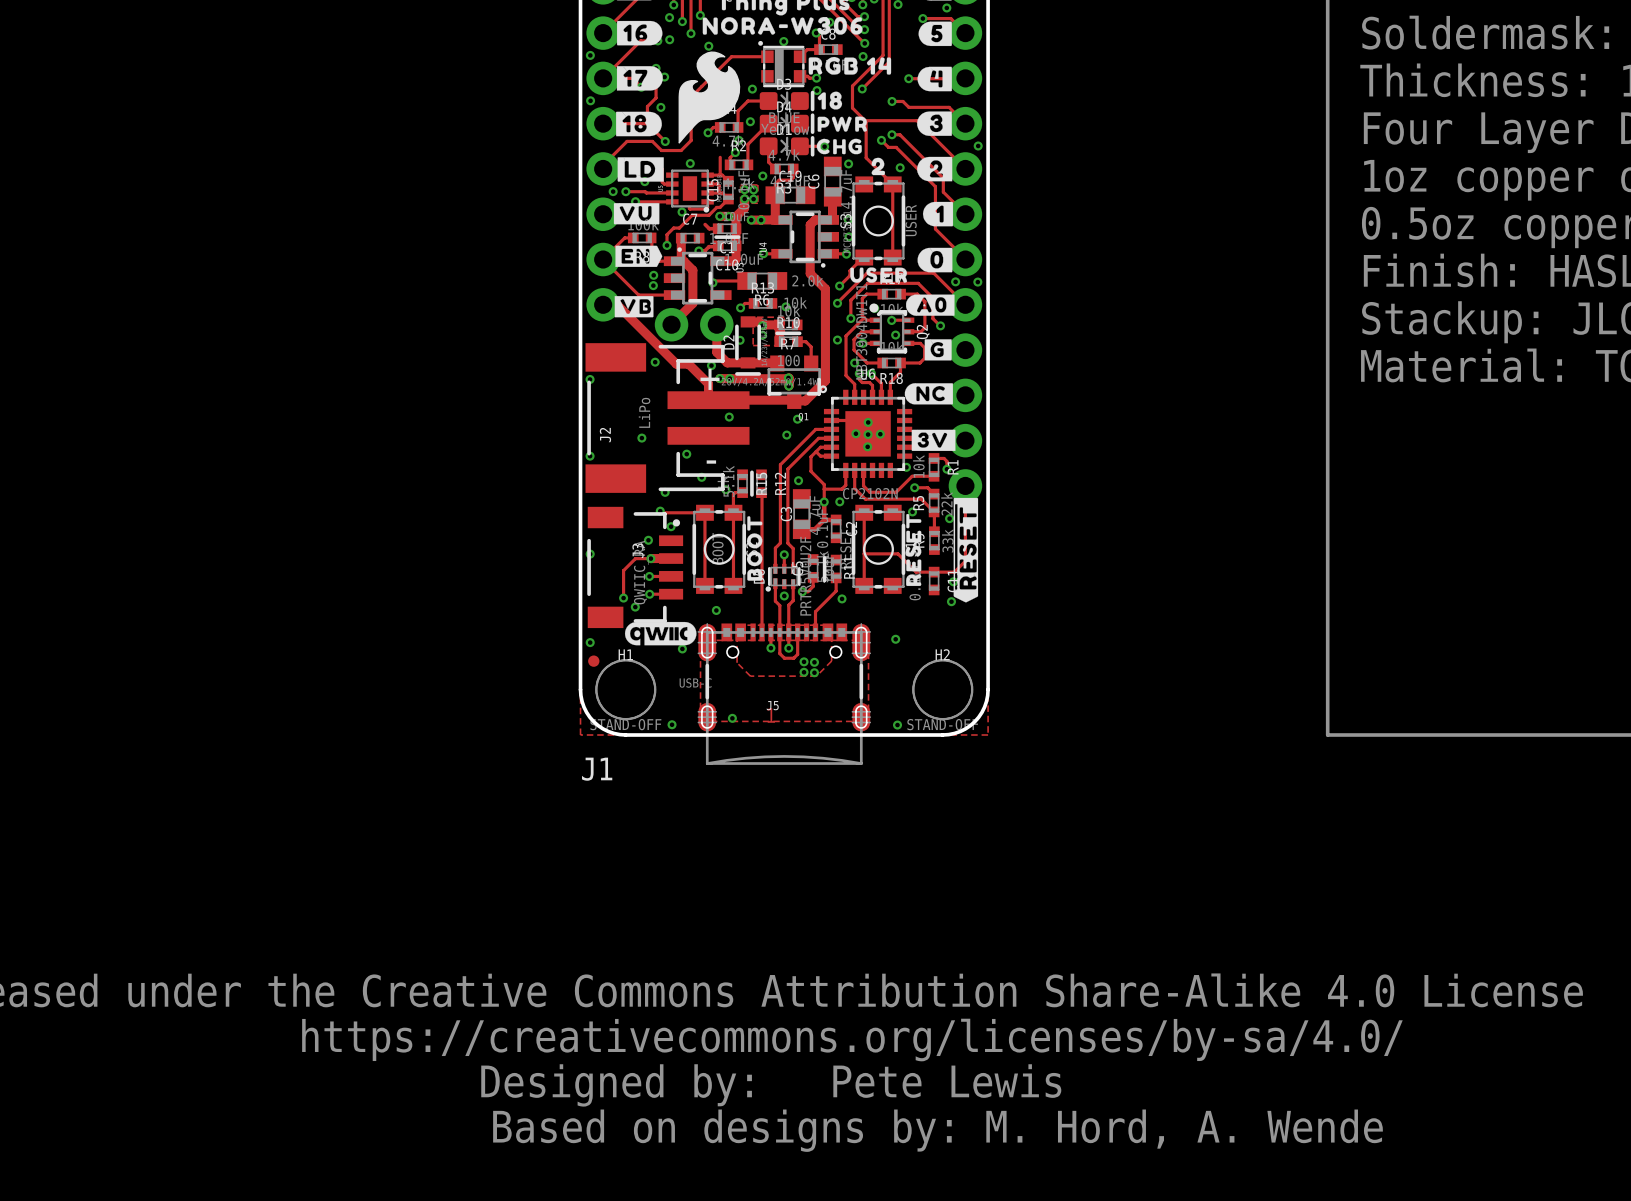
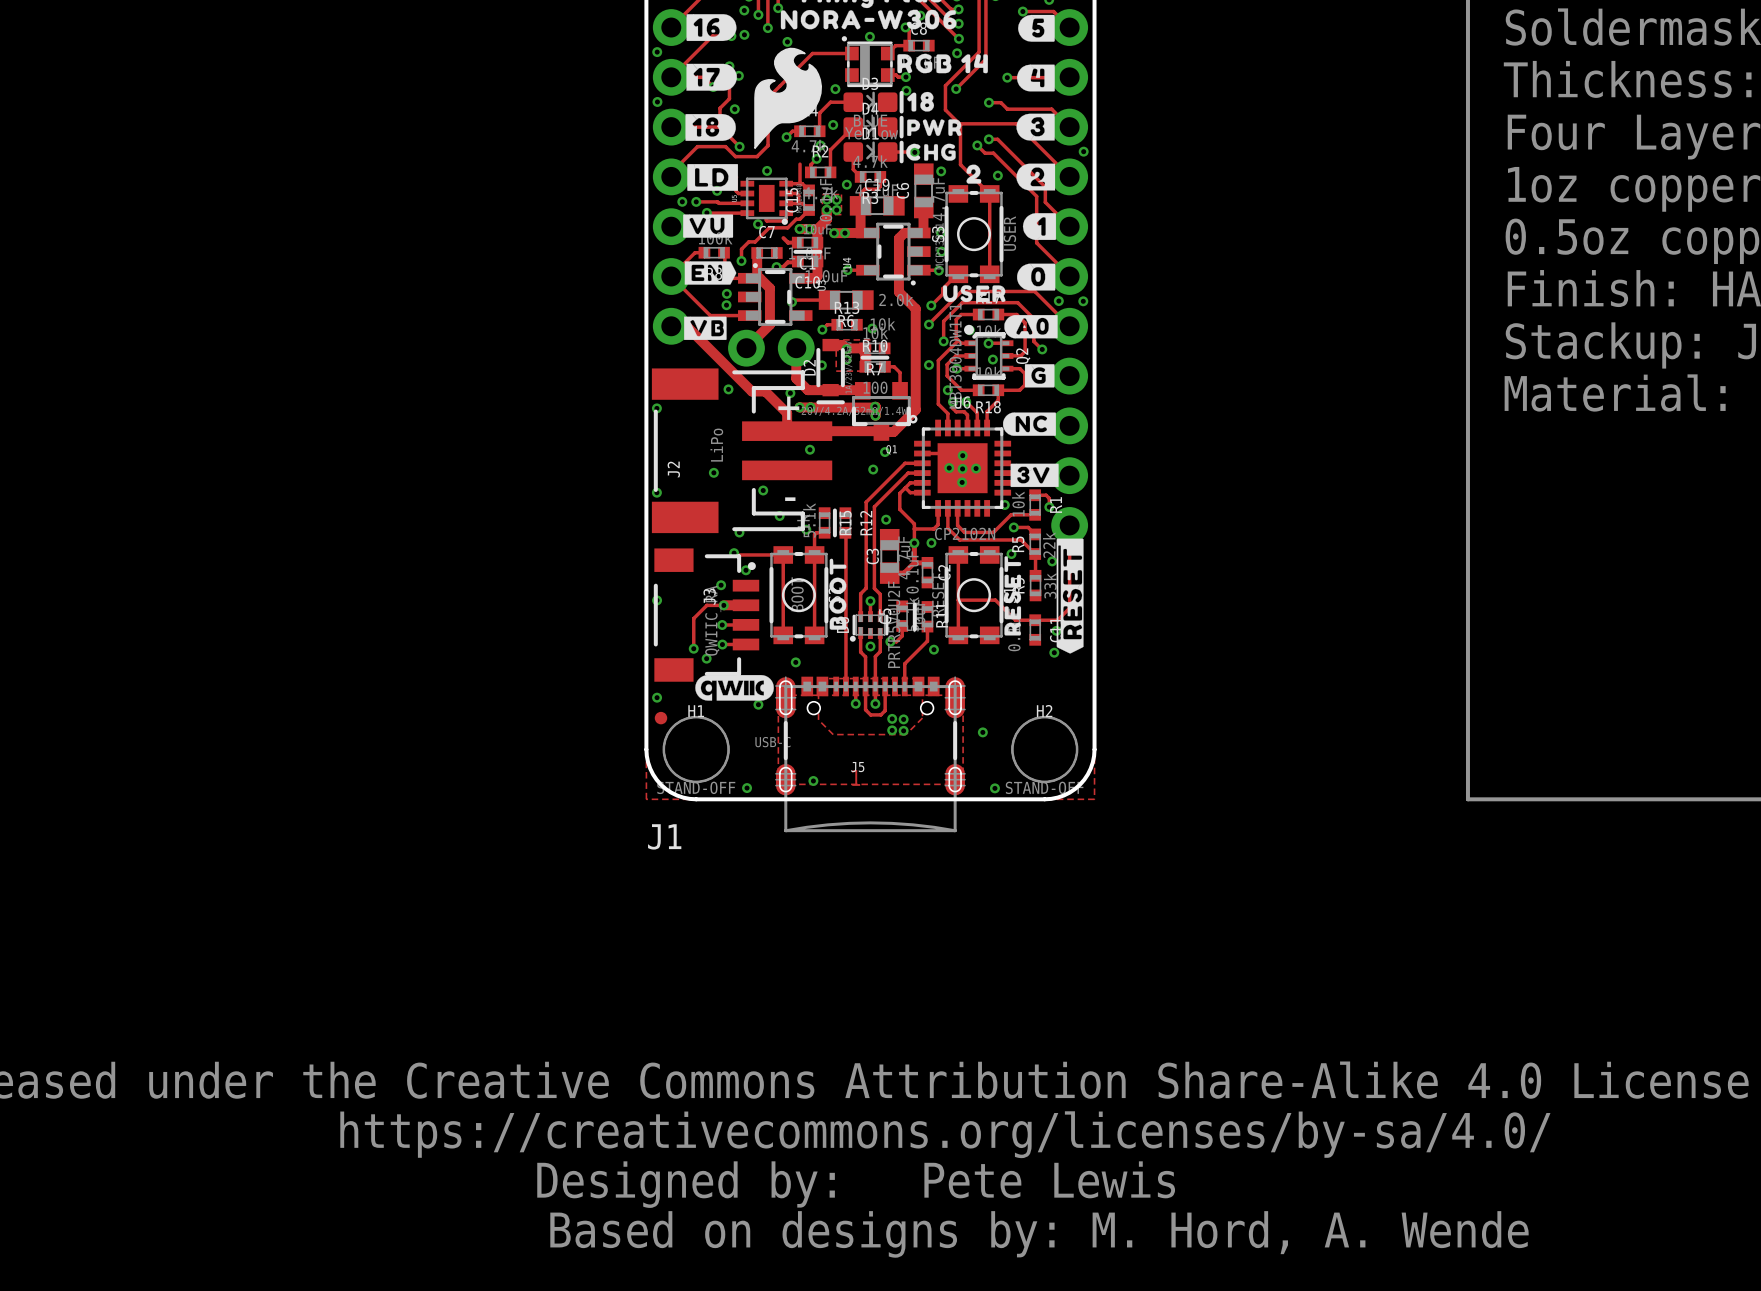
via position: (895, 639) -> (982, 732)

